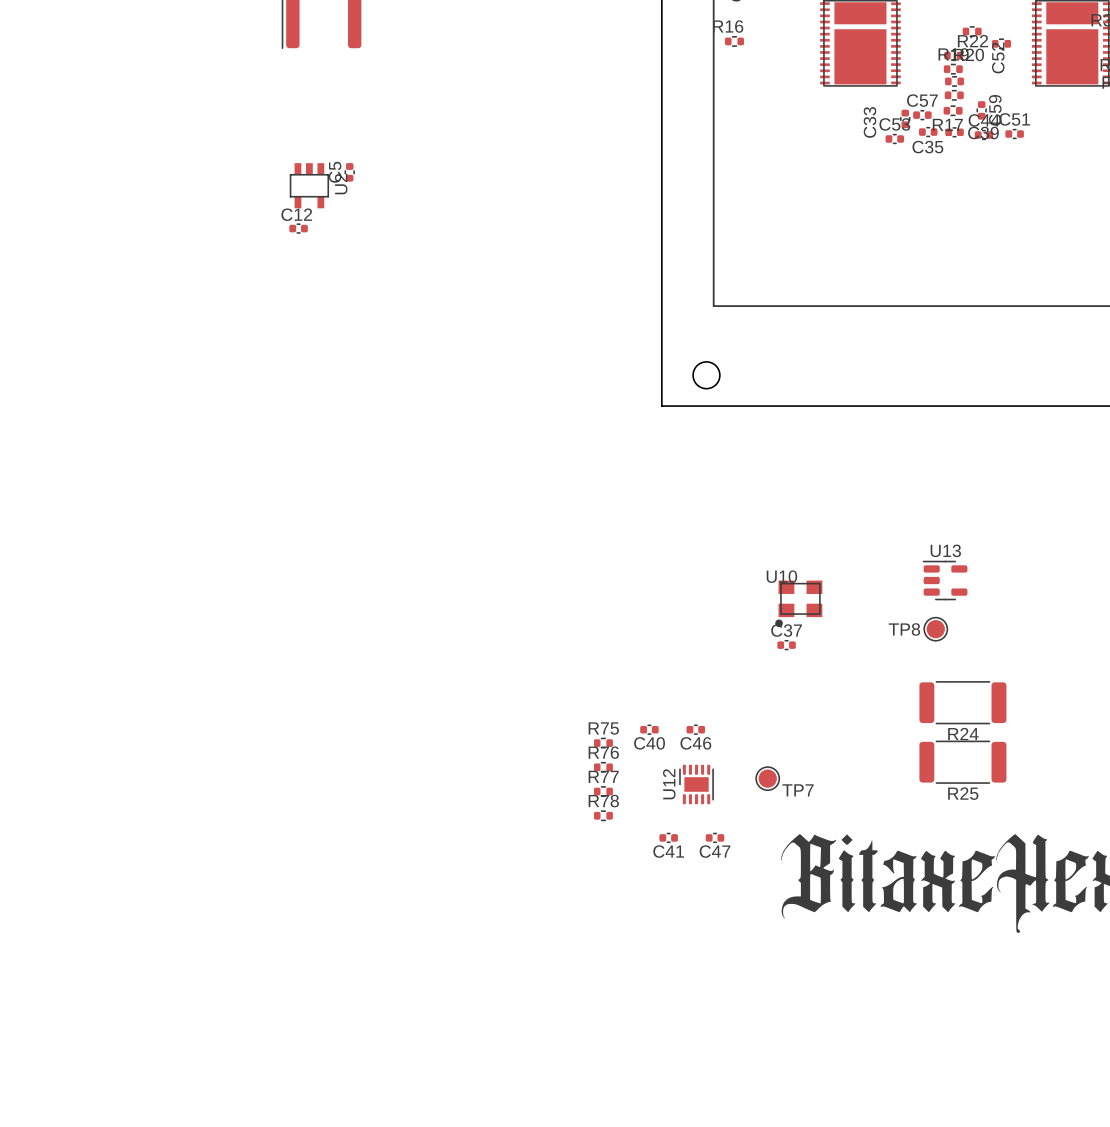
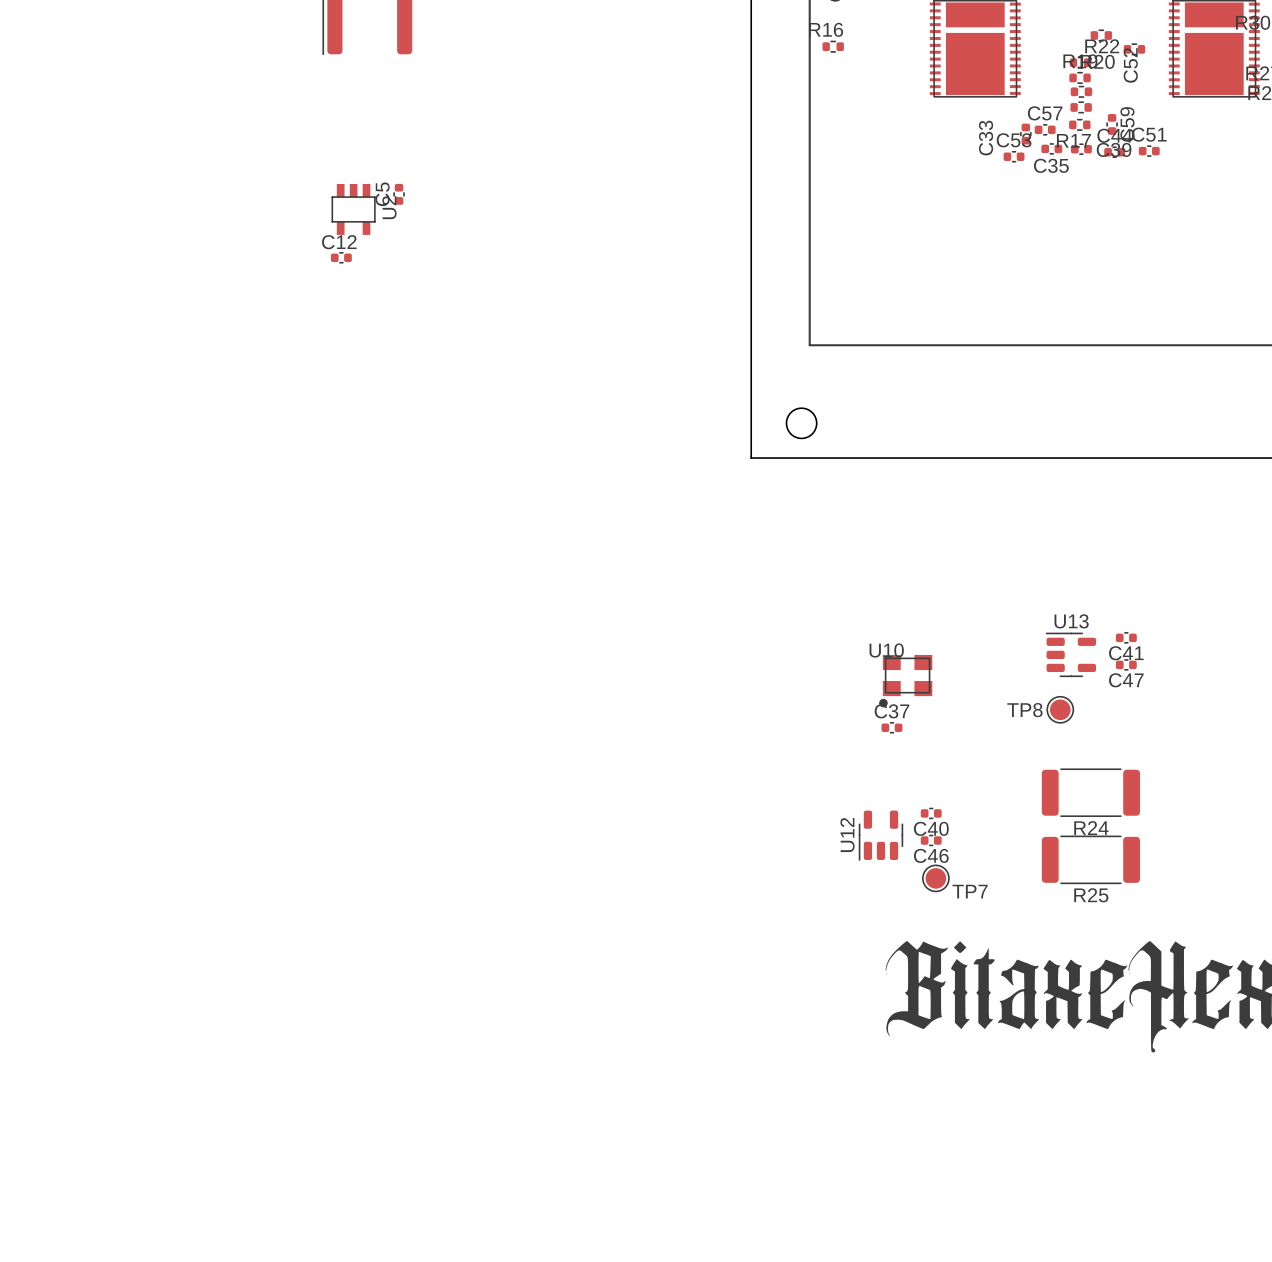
C40 position: (649, 729) -> (931, 813)
C46 position: (695, 729) -> (931, 840)
R75: (603, 743) -> none
U12 footprint: [679, 764, 714, 805] -> [858, 810, 904, 861]
R76: (603, 767) -> none
TP7 position: (767, 778) -> (935, 878)
R77: (603, 791) -> none
R78: (603, 815) -> none
C41 position: (668, 837) -> (1126, 637)
C47 position: (715, 837) -> (1126, 664)

